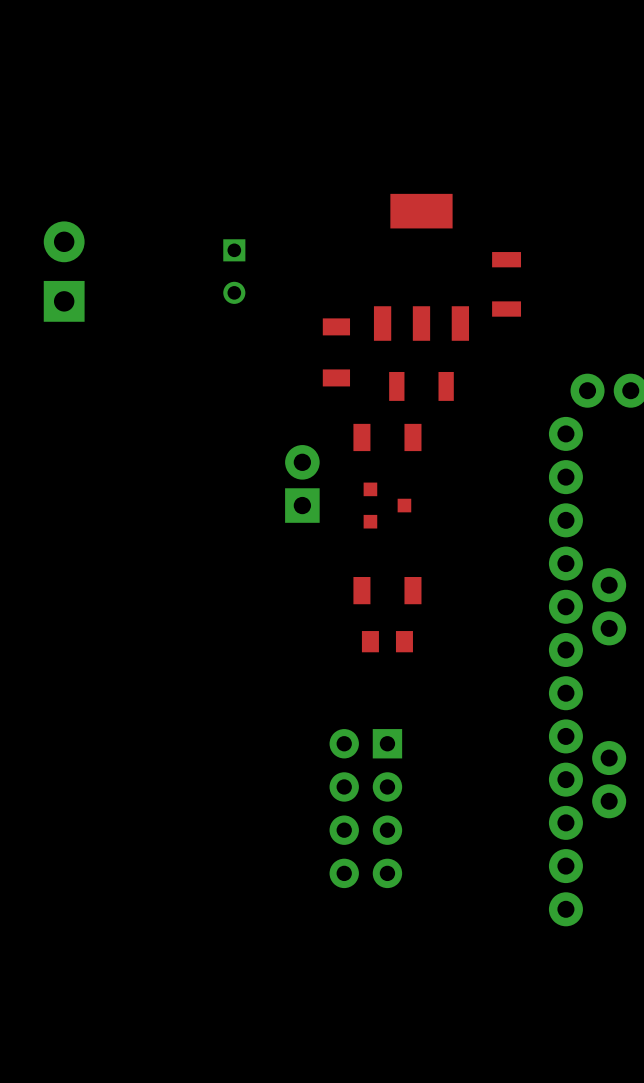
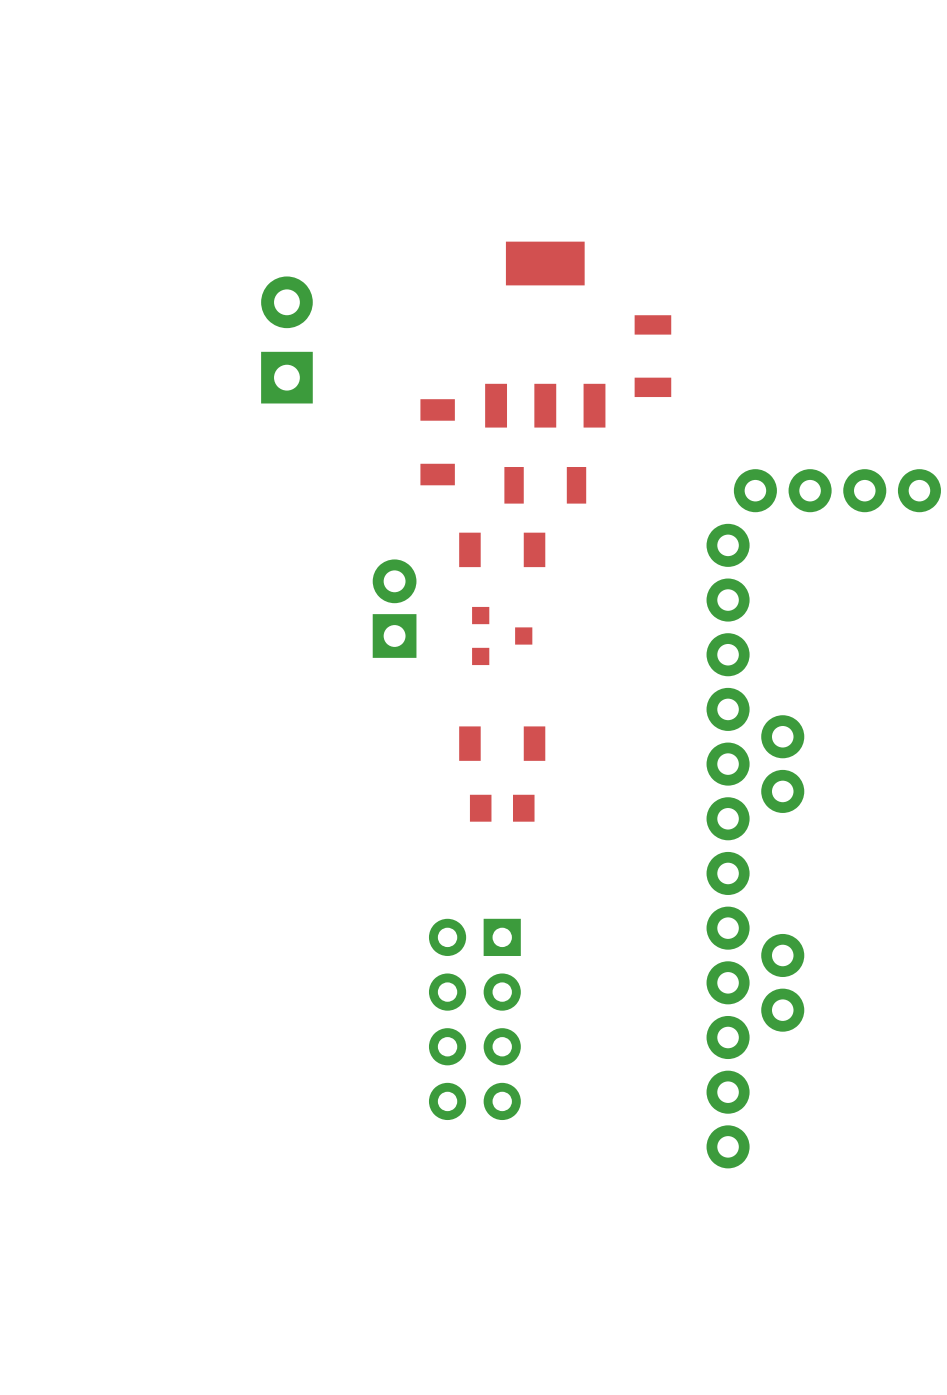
part footprint: [223, 239, 246, 304] -> [261, 276, 313, 404]
part: (64, 271) -> none

